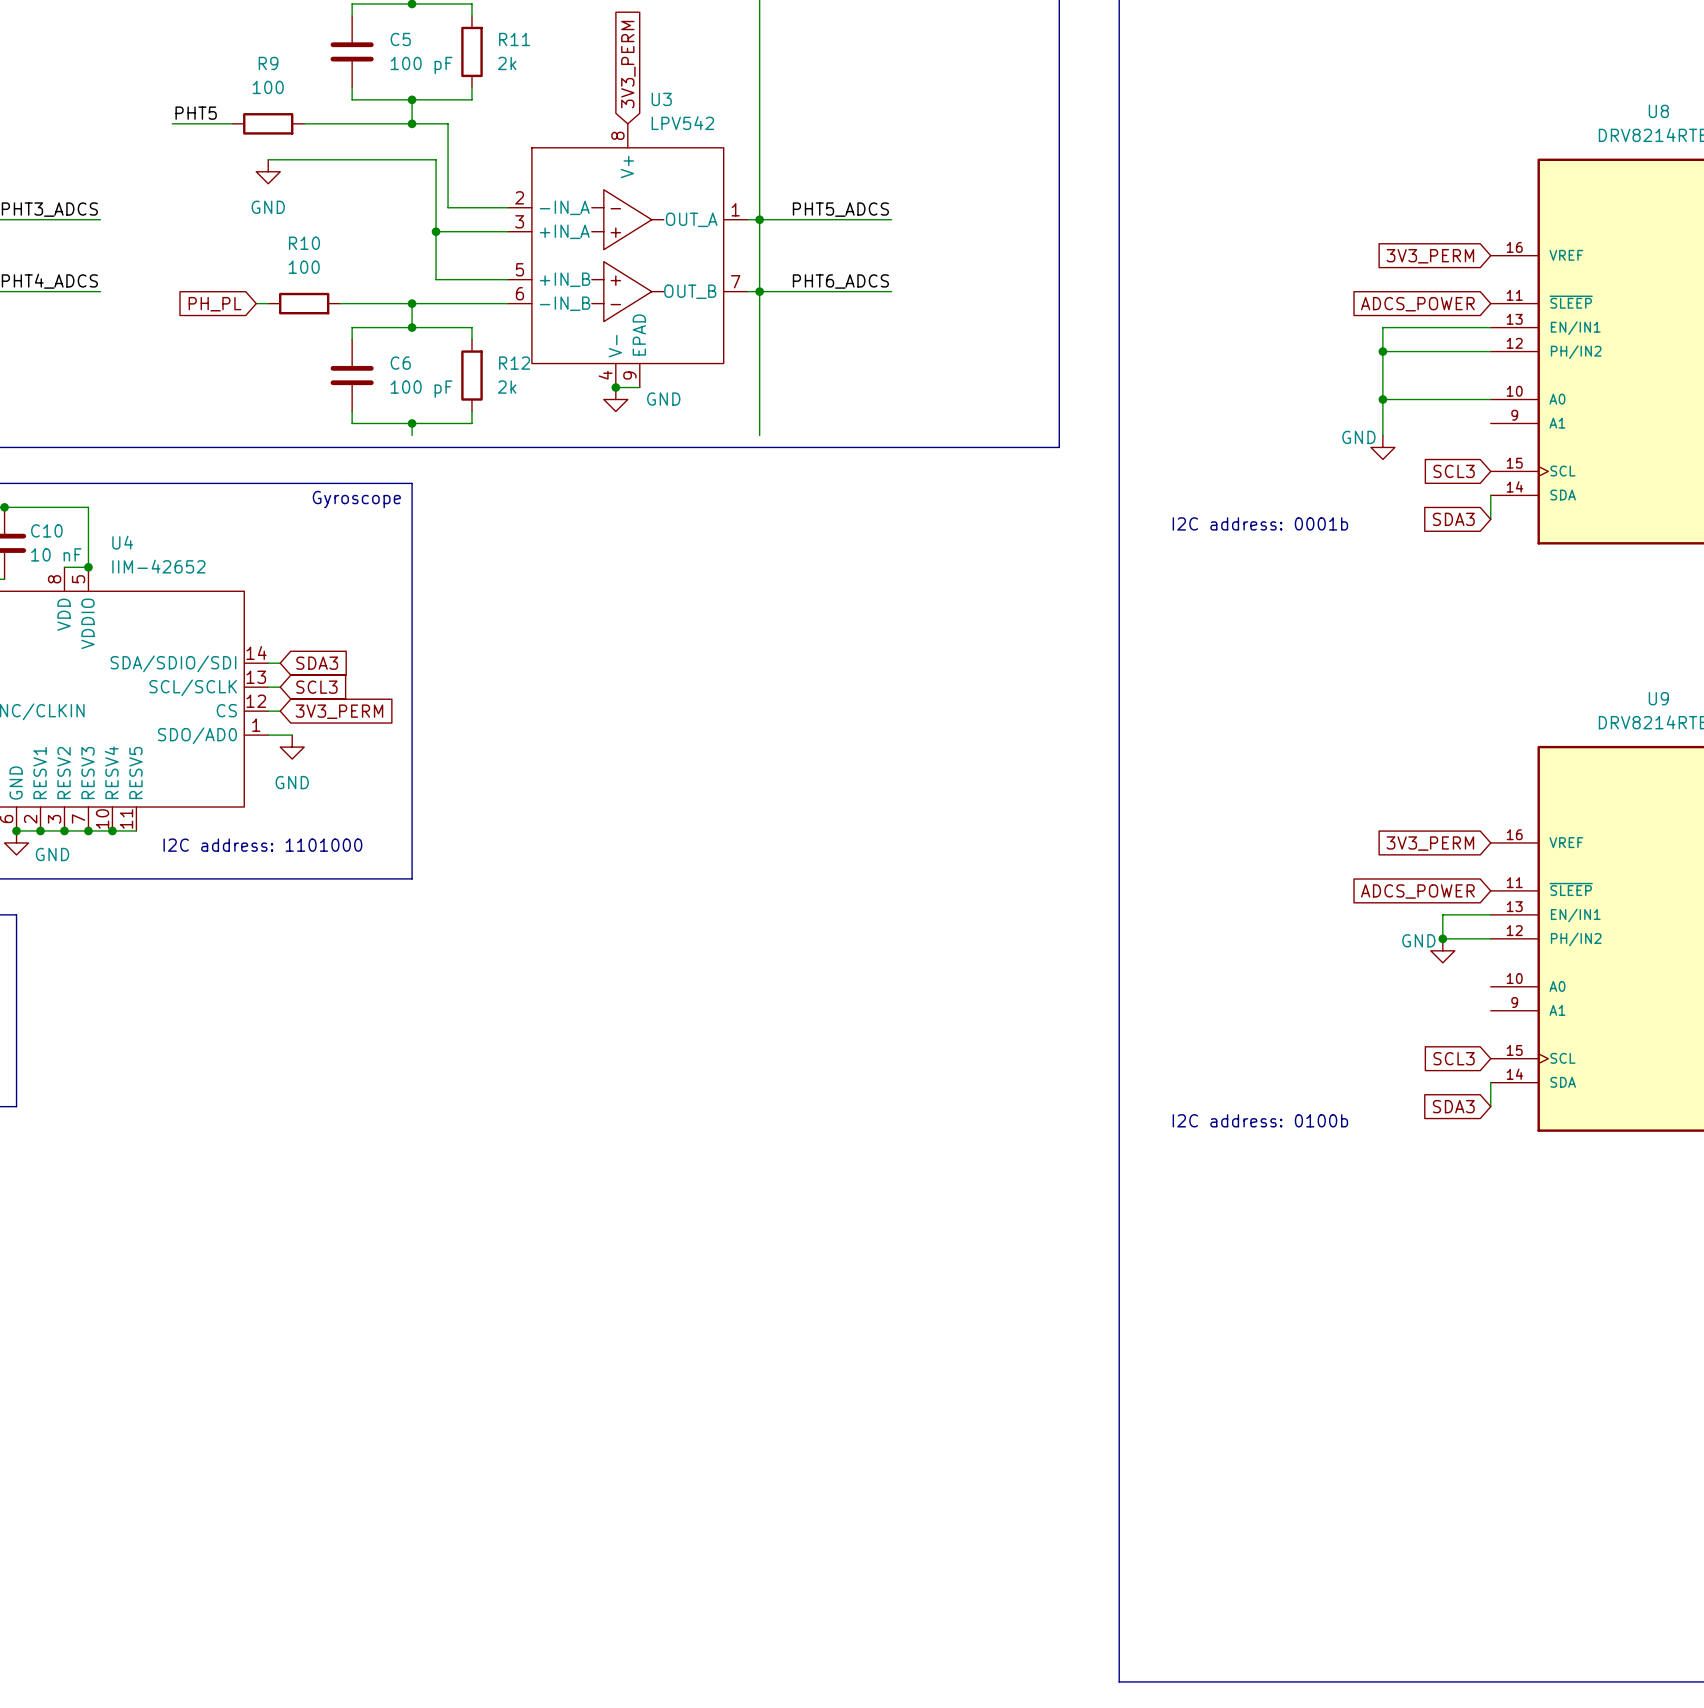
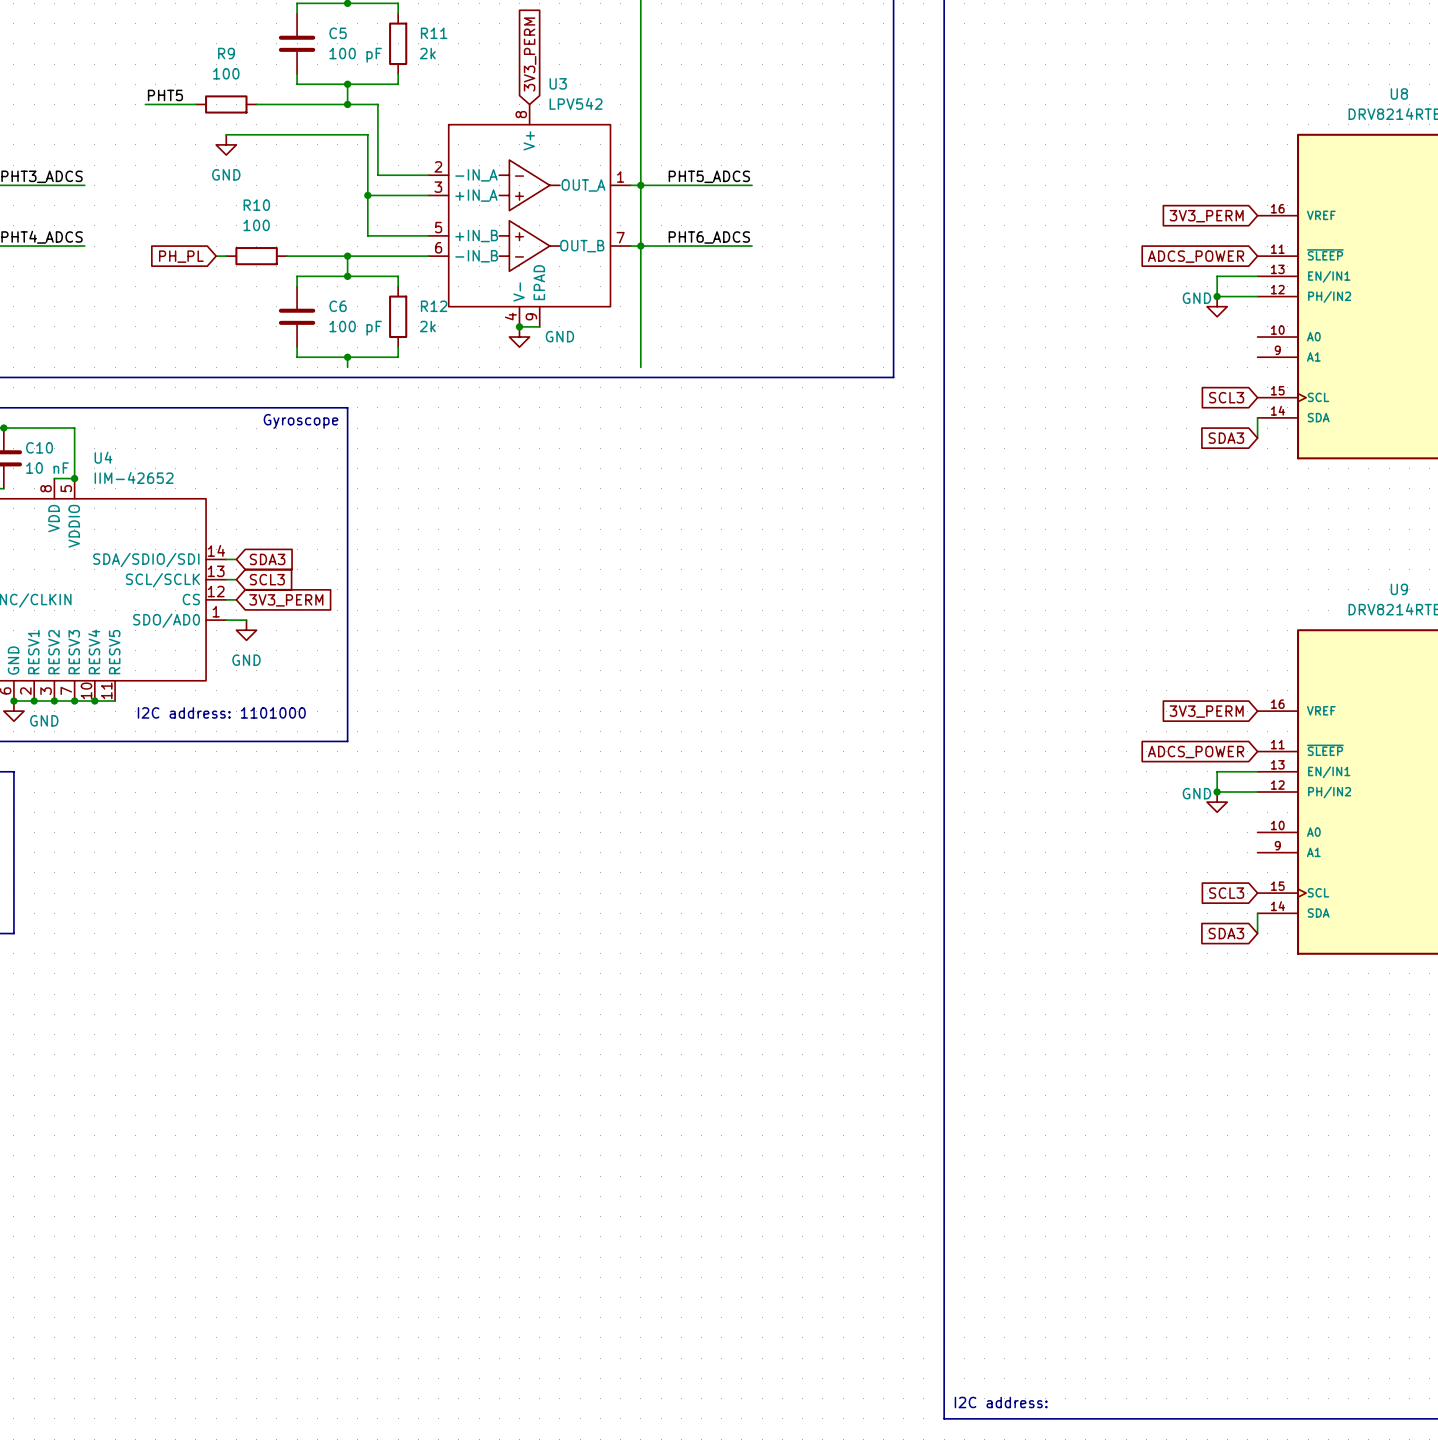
wire: (1442, 327) (1382, 327) (1382, 435) -> none
wire: (1382, 351) (1442, 351) -> (1217, 276) (1217, 296)
junction: (1382, 351) -> none
junction: none -> (1217, 296)
wire: (1382, 399) (1490, 399) -> none
junction: (1382, 399) -> none
power symbol position: GND (1382, 447) -> GND (1217, 306)
text: I2C address: 0001b (1260, 523) -> none
text: I2C address: 0100b (1260, 1120) -> none
text: none -> I2C address: (1001, 1402)

